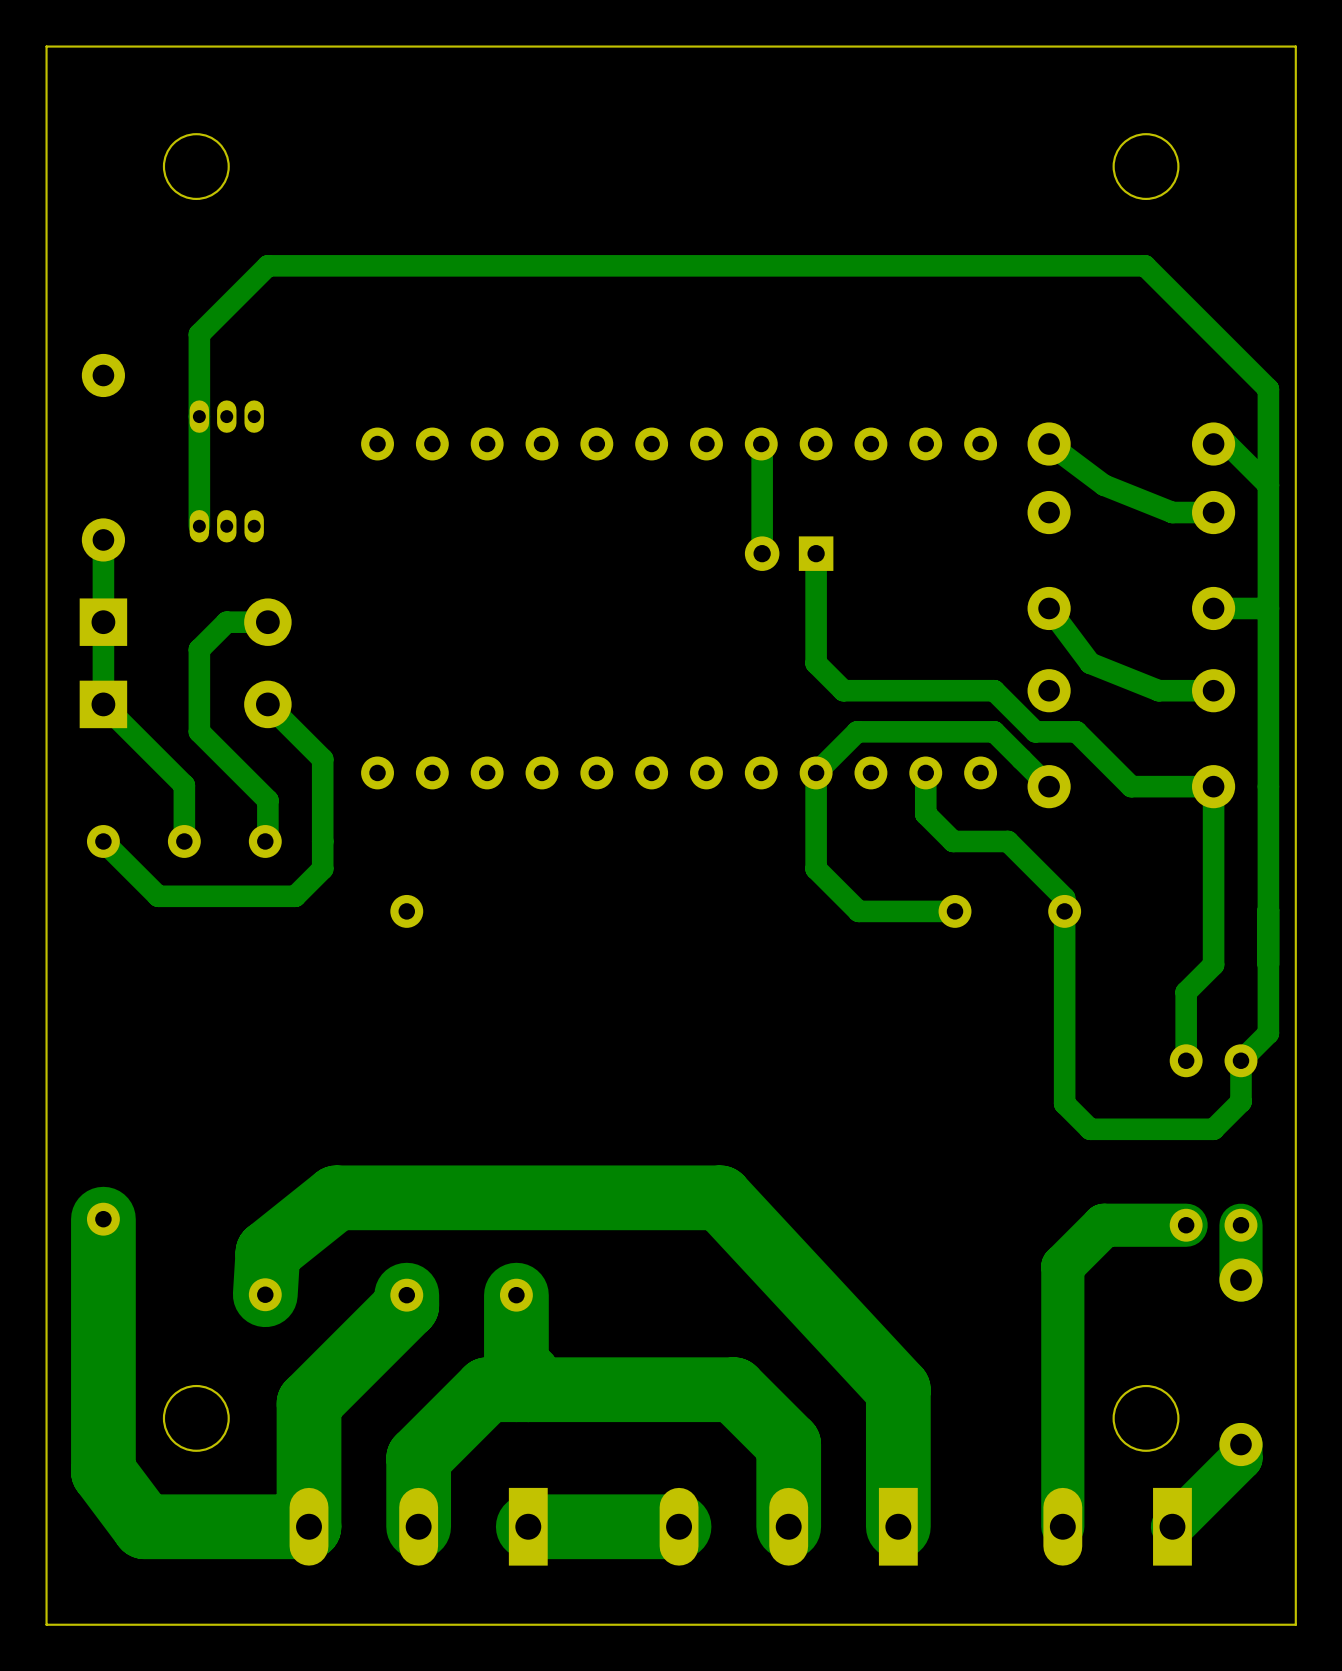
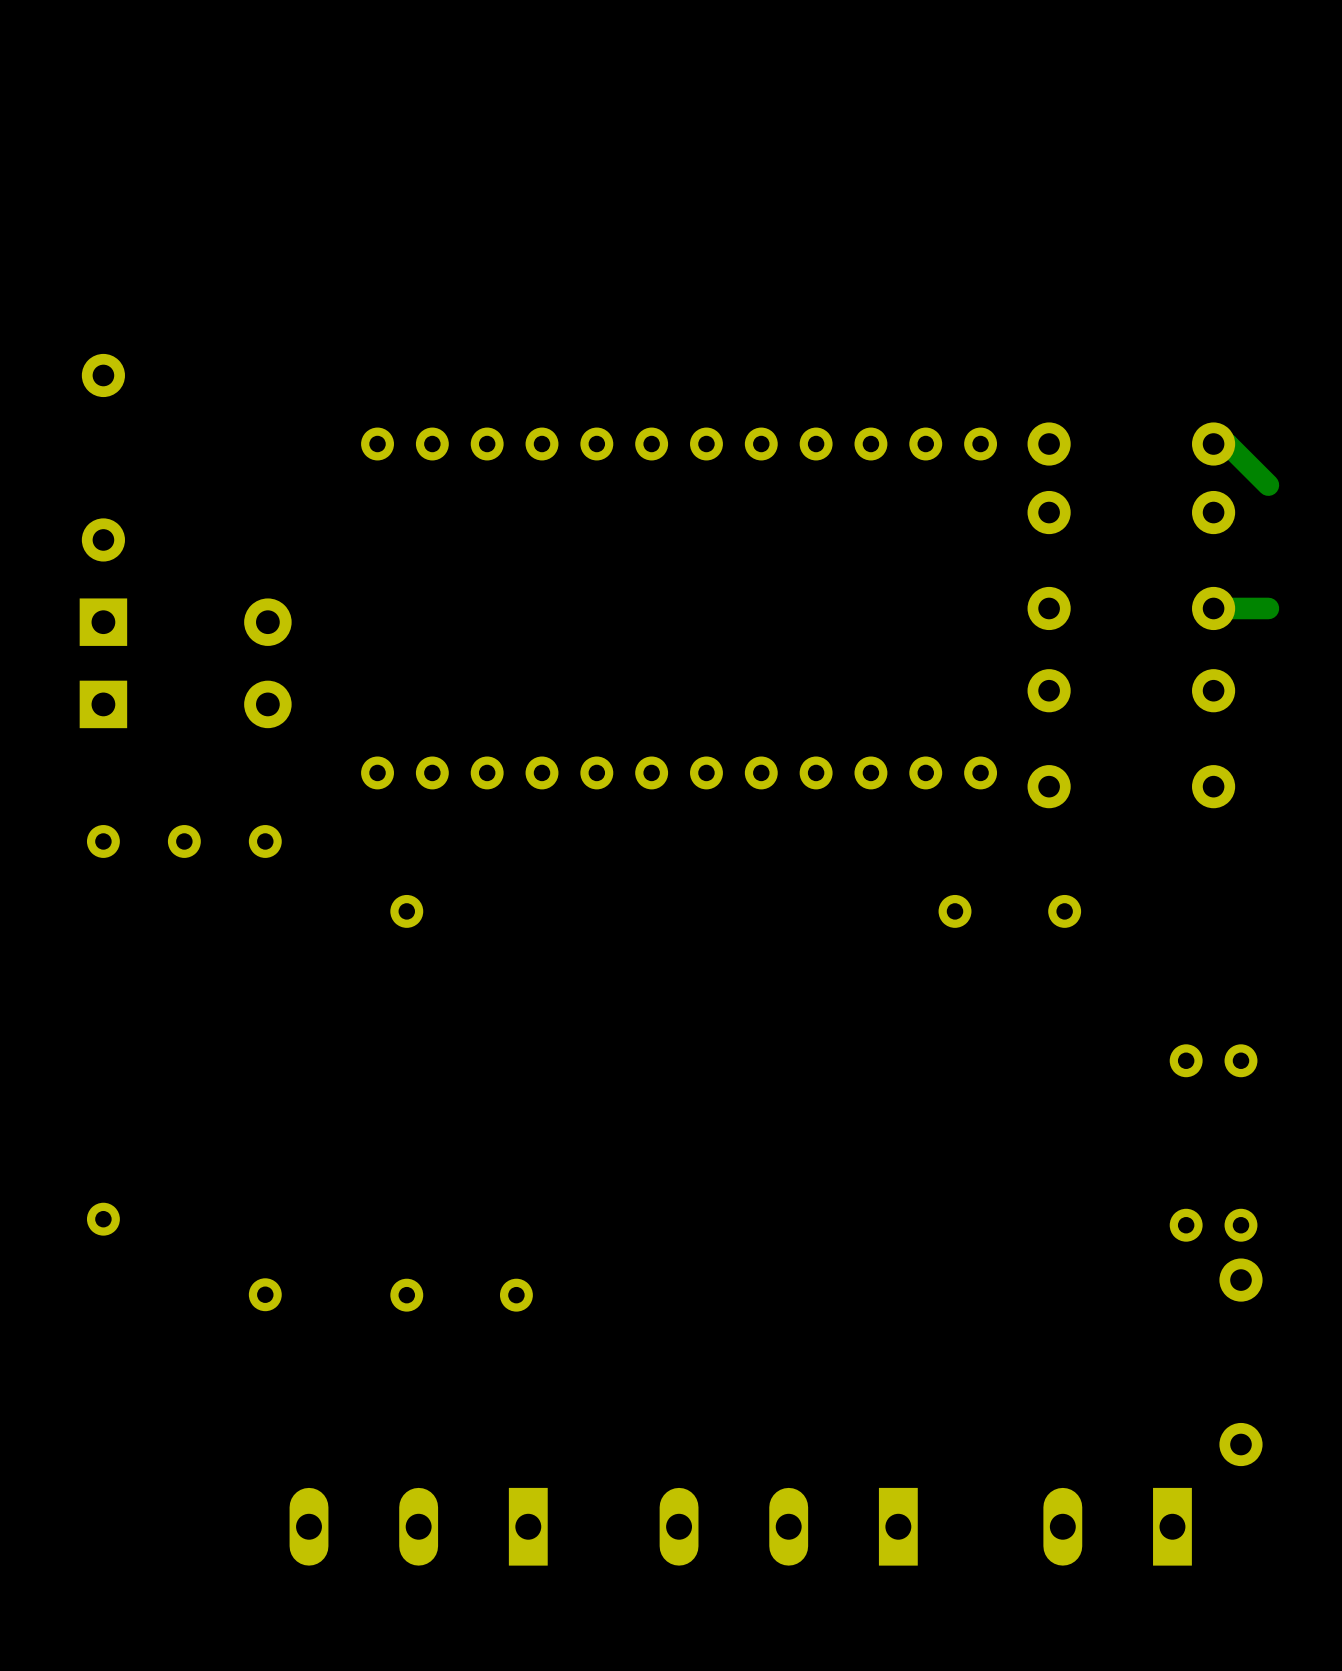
board edge: (1295, 46) (46, 46) (46, 1624) (1295, 1624) (1295, 46) -> none
round board edge: [162, 133, 230, 201] -> none
round board edge: [1112, 133, 1180, 201] -> none
part: (226, 416) -> none
bottom track: (761, 444) (762, 553) -> none
bottom track: (1049, 444) (1103, 485) (1172, 512) (1213, 512) -> none
bottom track: (199, 526) (199, 334) (267, 265) (1145, 265) (1268, 389) (1268, 1033) (1240, 1060) (1240, 1101) (1213, 1129) (1090, 1129) (1064, 1103) (1064, 898) (1007, 841) (953, 841) (925, 814) (925, 772) -> none
part: (226, 526) -> none
bottom track: (103, 539) (103, 704) (184, 785) (184, 841) -> none
part: (789, 553) -> none
bottom track: (816, 553) (816, 663) (843, 690) (994, 690) (1035, 731) (1076, 731) (1131, 786) (1213, 786) (1213, 964) (1186, 992) (1186, 1060) -> none
bottom track: (1049, 608) (1090, 663) (1158, 690) (1213, 690) -> none
bottom track: (267, 622) (226, 622) (199, 649) (199, 731) (267, 800) (267, 838) (265, 841) -> none
bottom track: (267, 704) (322, 759) (322, 868) (295, 896) (158, 896) (103, 841) -> none
bottom track: (1049, 786) (994, 731) (857, 731) (816, 772) (816, 868) (858, 911) (955, 911) -> none
bottom track: (103, 1219) (103, 1471) (144, 1526) (309, 1526) (309, 1403) (406, 1305) (406, 1295) -> none
bottom track: (1186, 1225) (1103, 1225) (1062, 1266) (1062, 1526) -> none
bottom track: (1240, 1225) (1240, 1280) -> none
bottom track: (265, 1294) (267, 1252) (336, 1197) (720, 1197) (898, 1389) (898, 1526) -> none
bottom track: (516, 1295) (516, 1389) (528, 1377) -> none
round board edge: [162, 1384, 230, 1452] -> none
round board edge: [1112, 1384, 1180, 1452] -> none
bottom track: (1240, 1444) (1240, 1458) (1172, 1526) -> none
bottom track: (679, 1526) (528, 1526) -> none
bottom track: (788, 1526) (788, 1444) (733, 1389) (487, 1389) (418, 1458) (418, 1526) -> none

